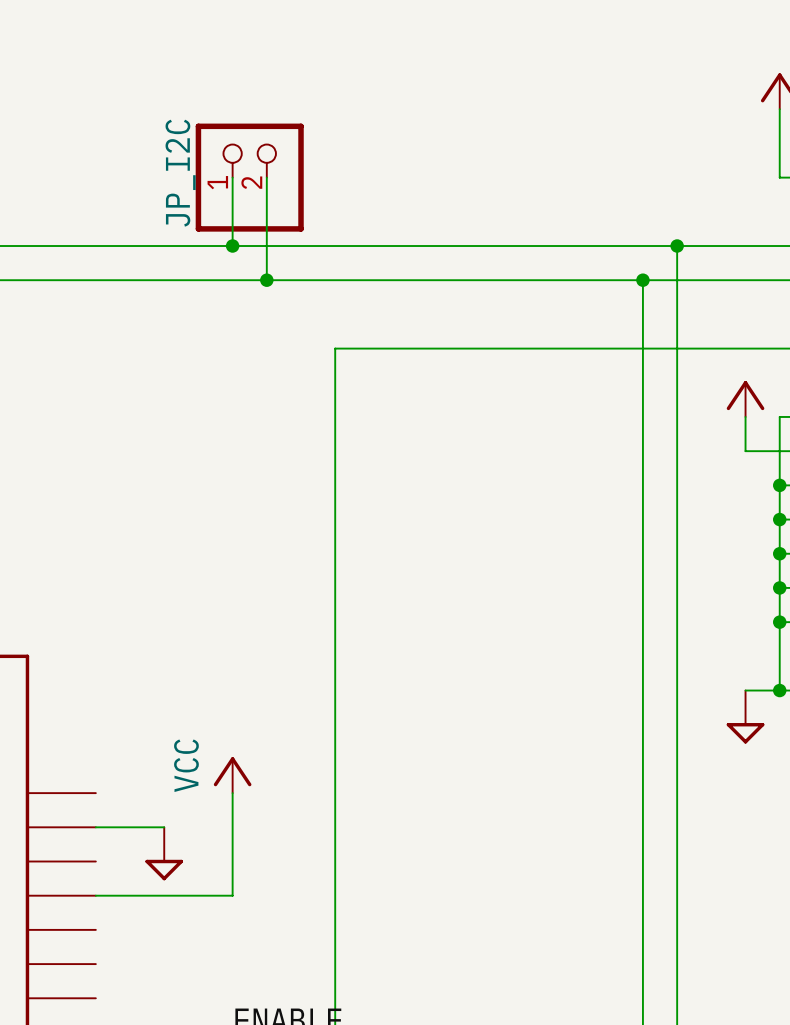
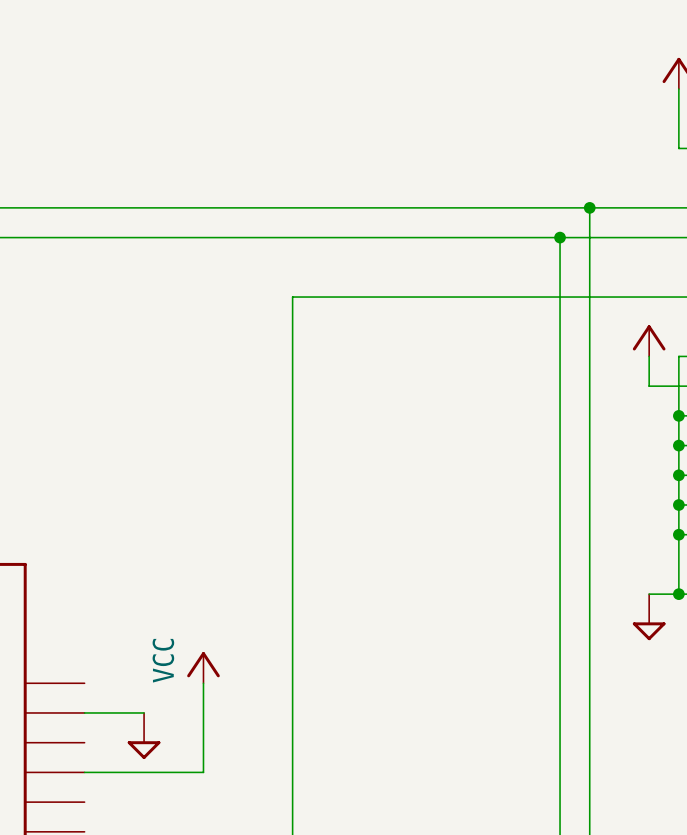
wire: (232, 177) (232, 246) -> none
JP_I2C: (249, 177) -> none
wire: (266, 177) (266, 280) -> none
junction: (232, 246) -> none
junction: (266, 280) -> none

